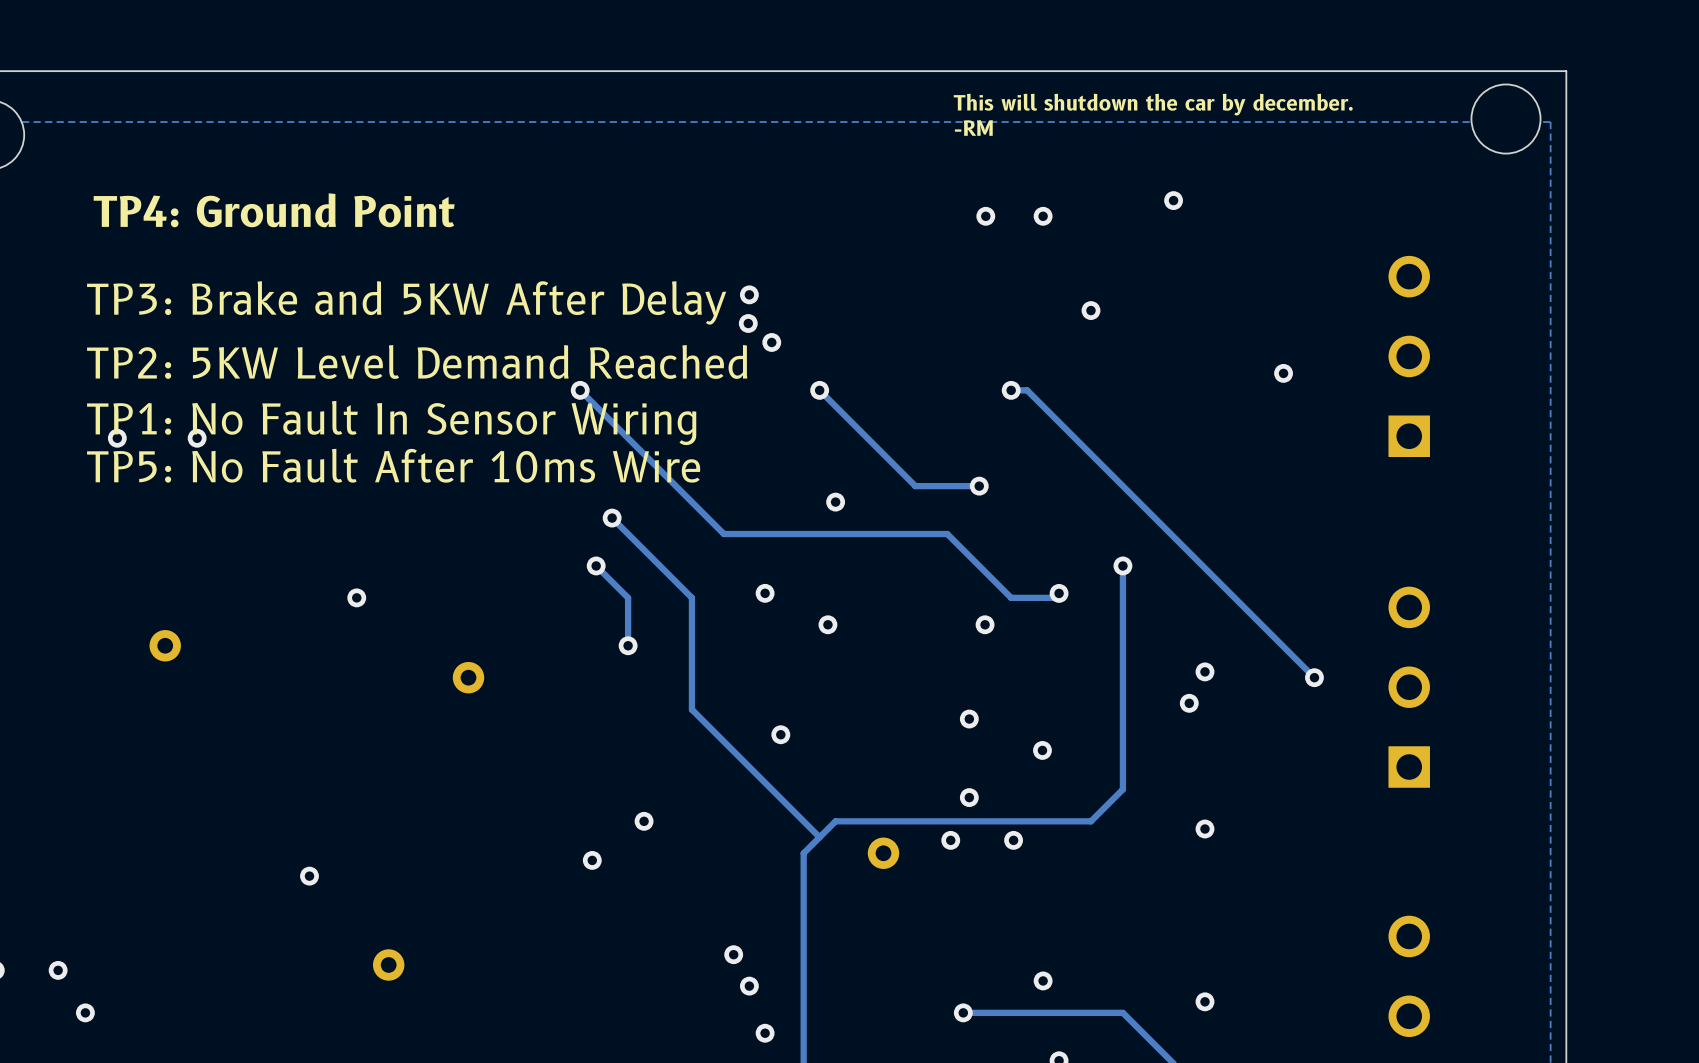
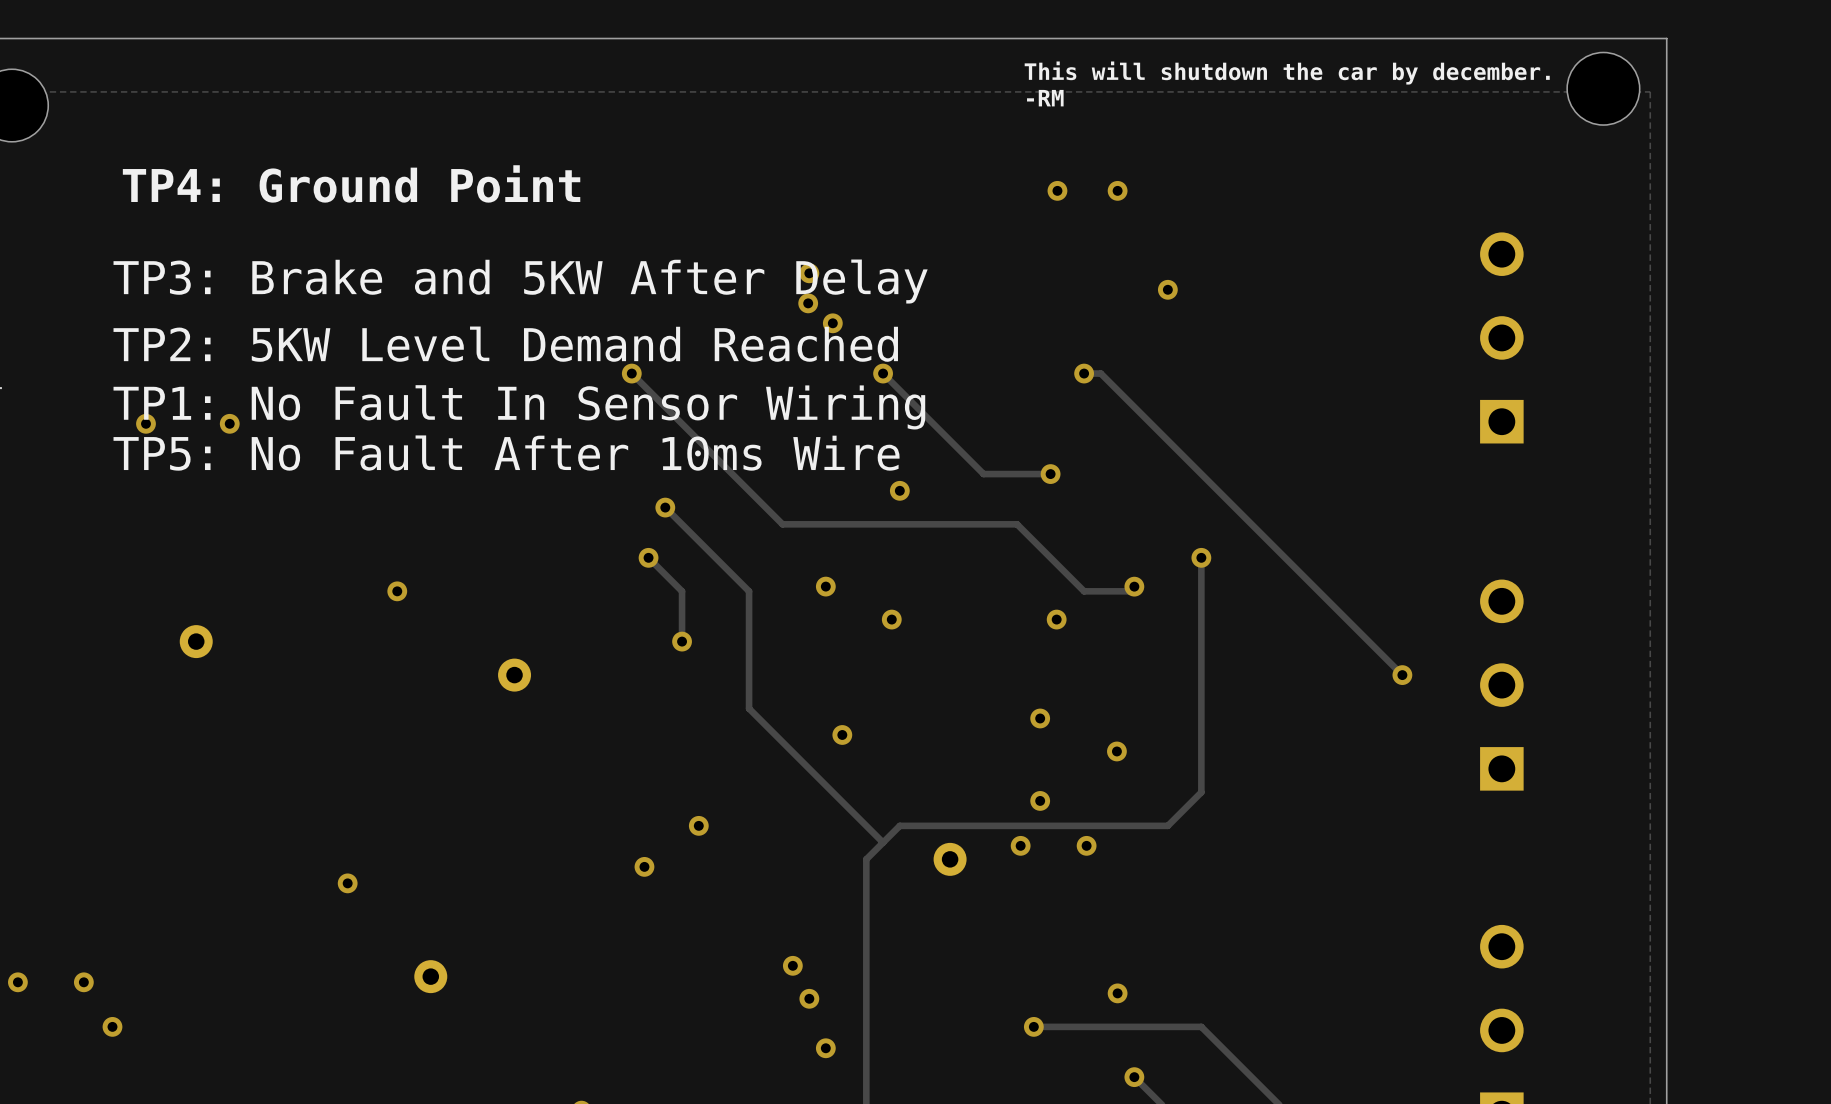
via: (1173, 200) -> none
via: (1283, 373) -> none
via: (1204, 671) -> none
via: (1189, 703) -> none
via: (1204, 829) -> none
via: (1204, 1001) -> none

